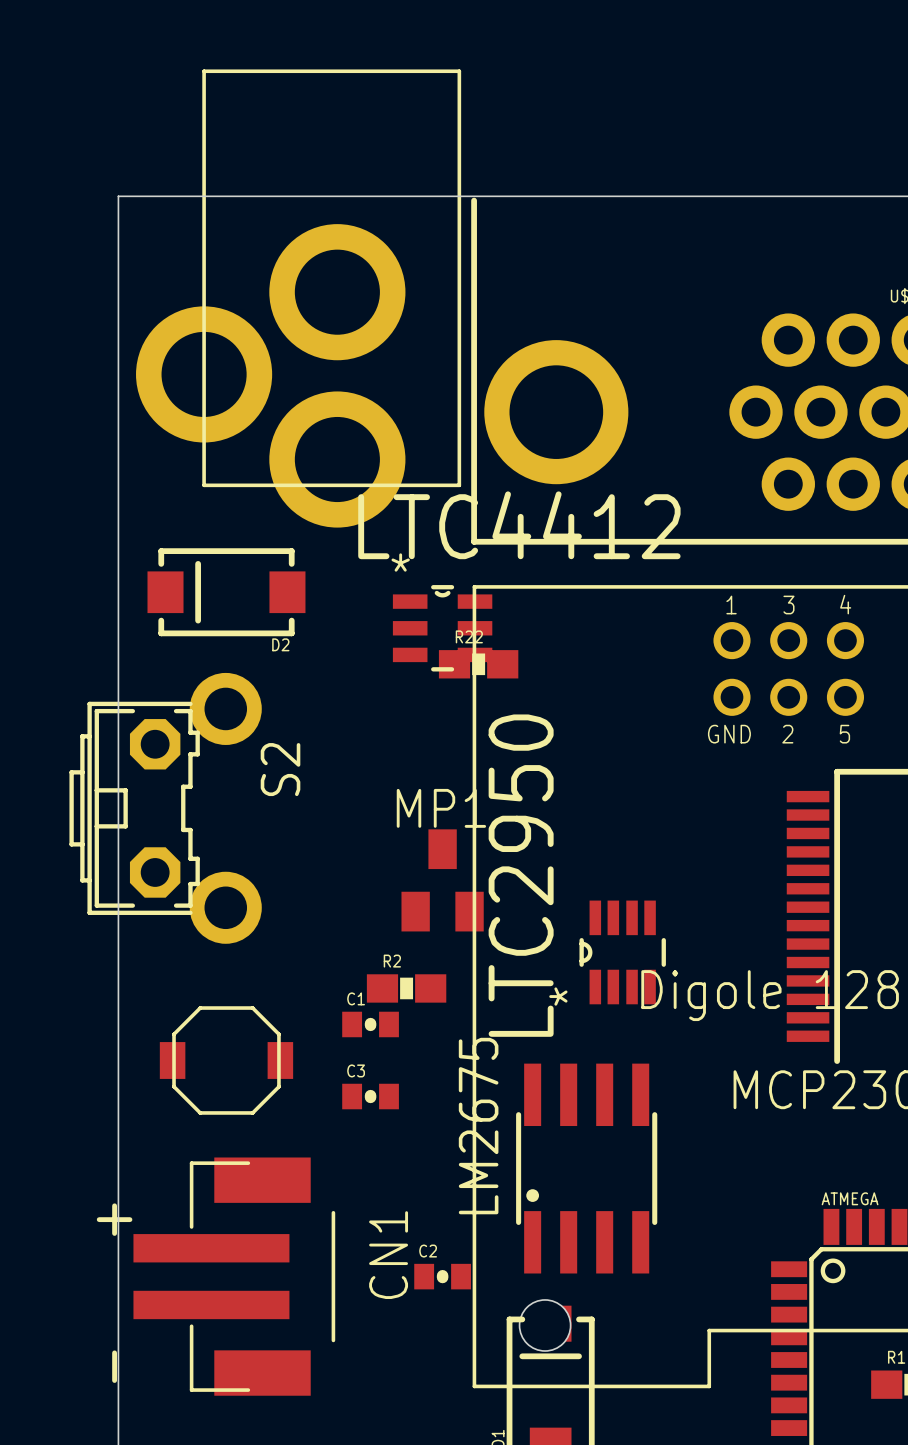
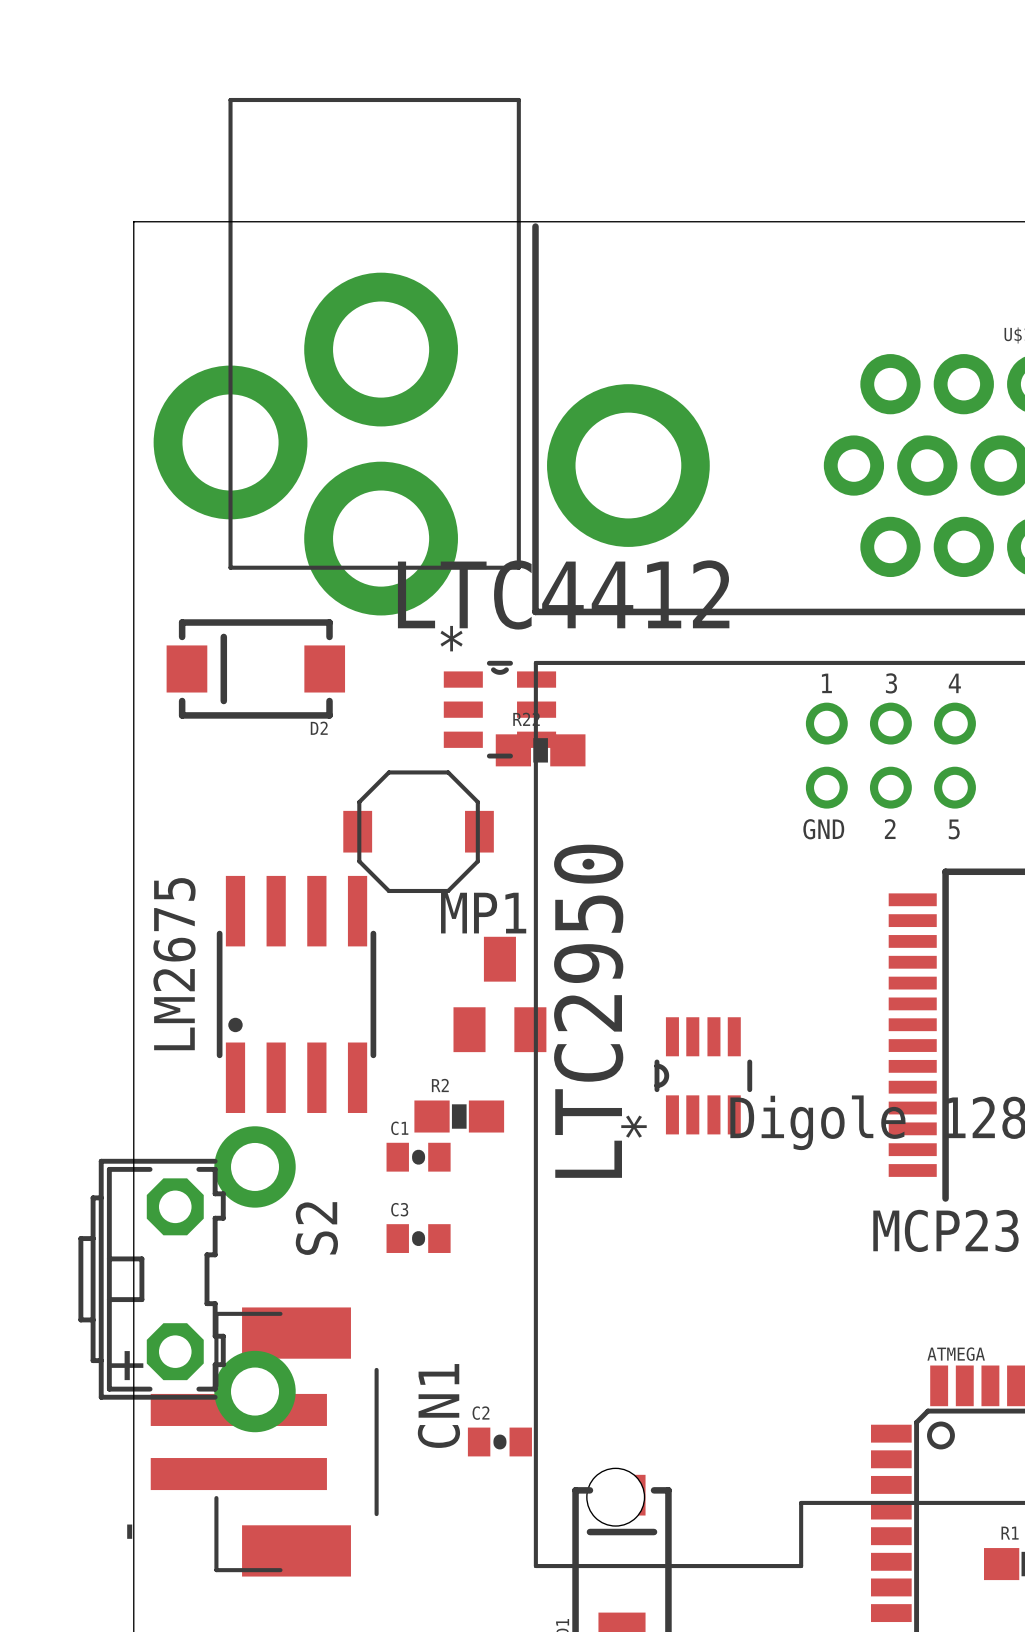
part position: (298, 298) -> (337, 356)
S2 position: (165, 808) -> (187, 1279)
part position: (226, 1060) -> (418, 831)
LM2675 position: (586, 1168) -> (296, 994)

